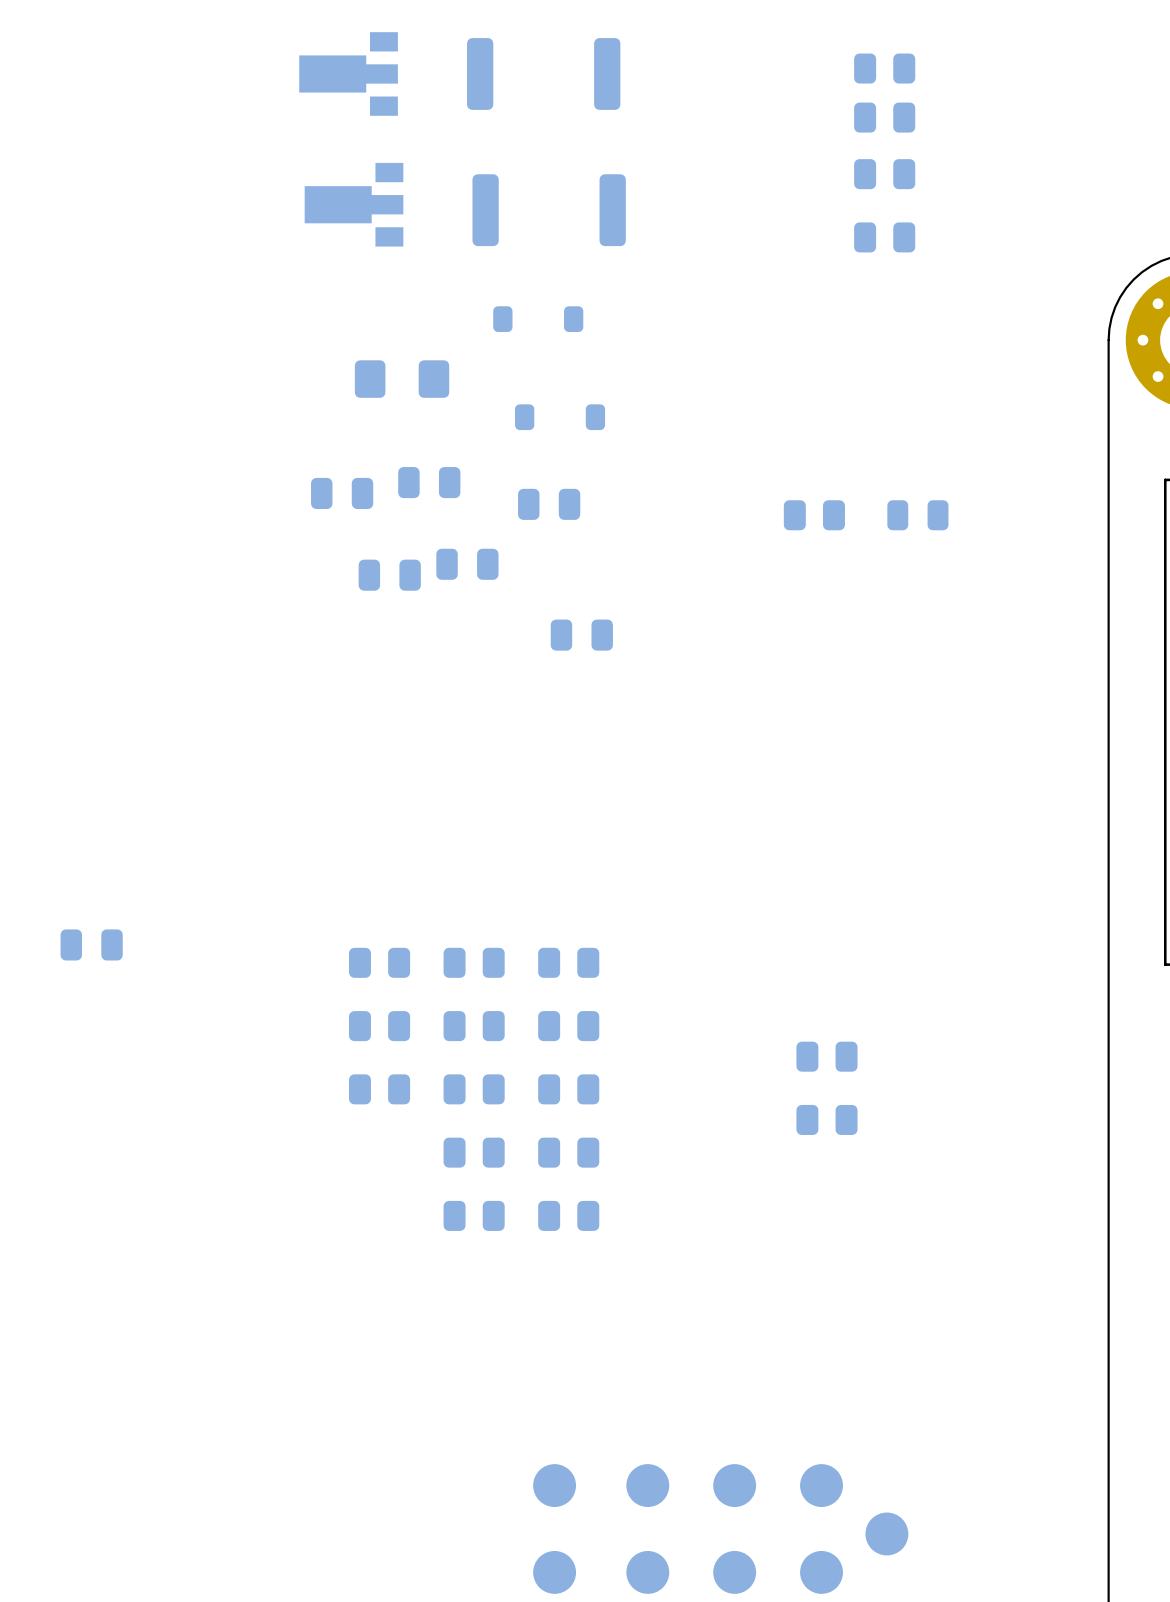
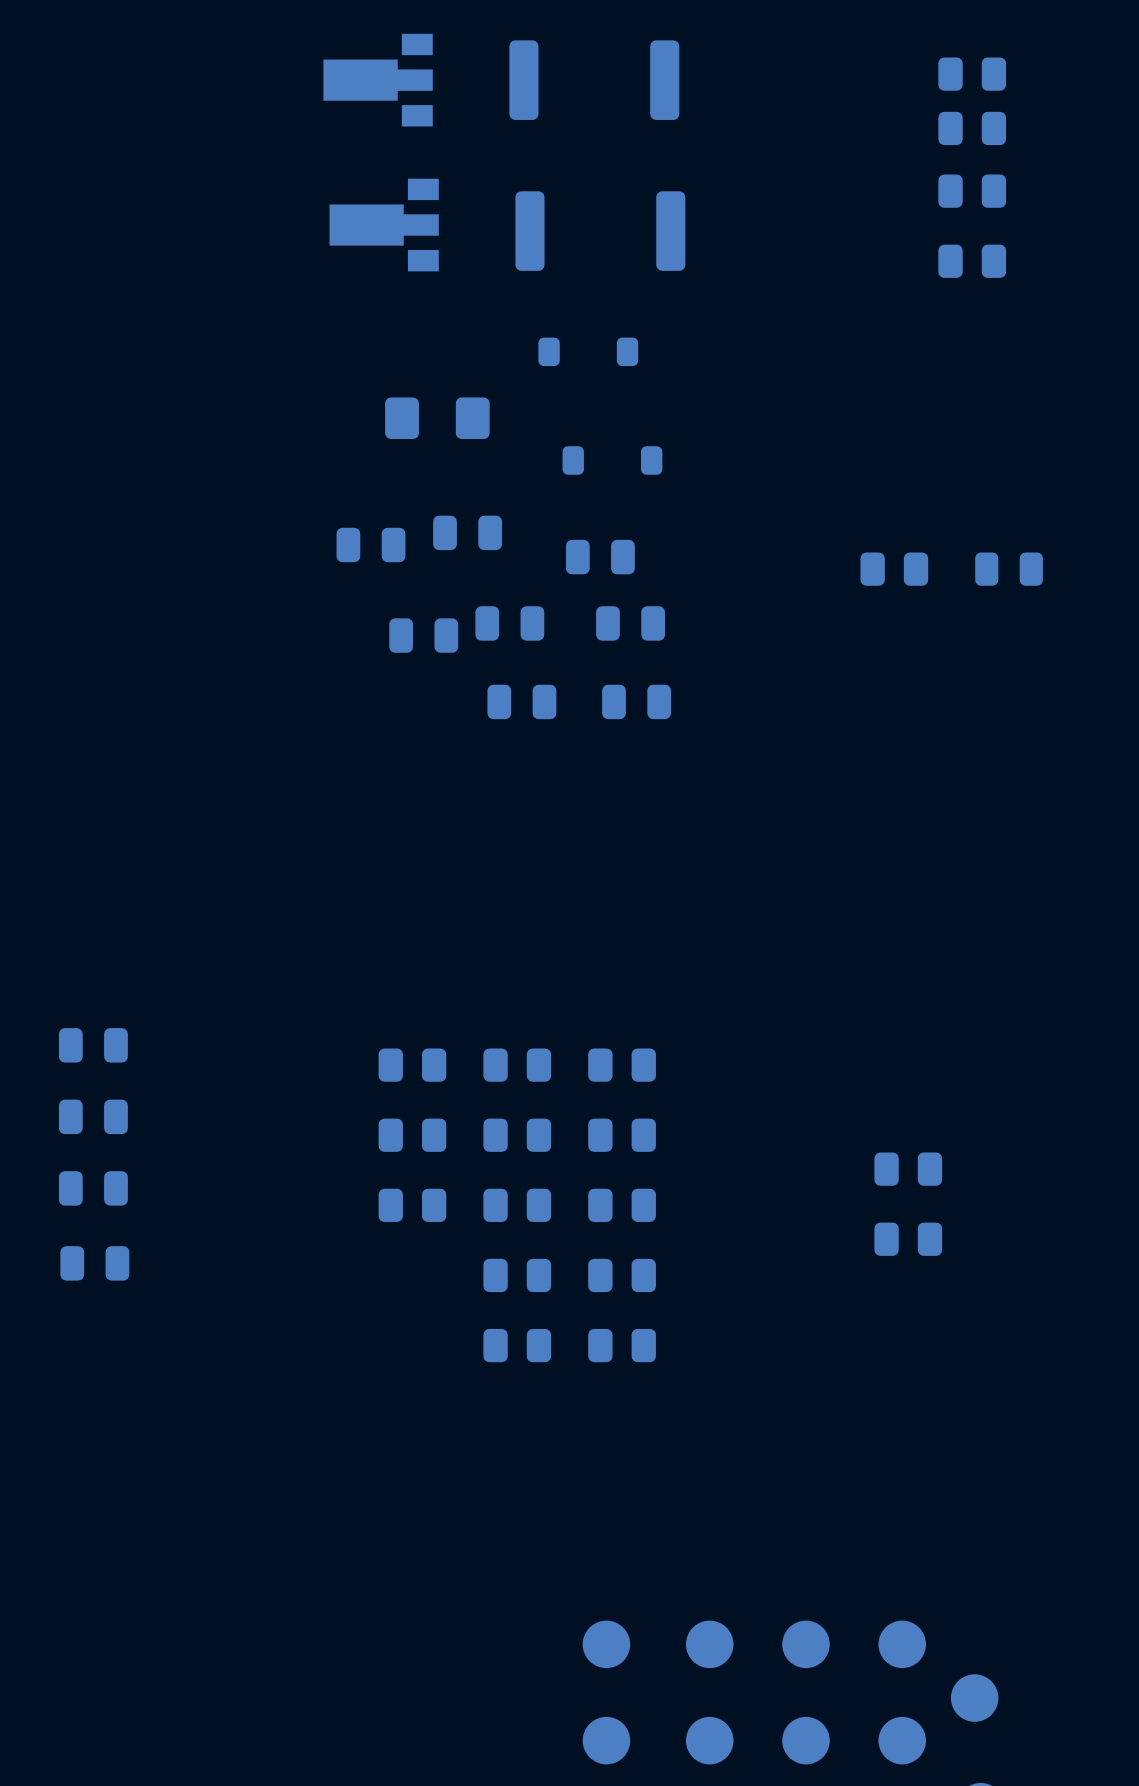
part: none -> (630, 623)
part: none -> (521, 701)
part: none -> (93, 1116)
part: none -> (93, 1188)
part: none -> (94, 1263)

